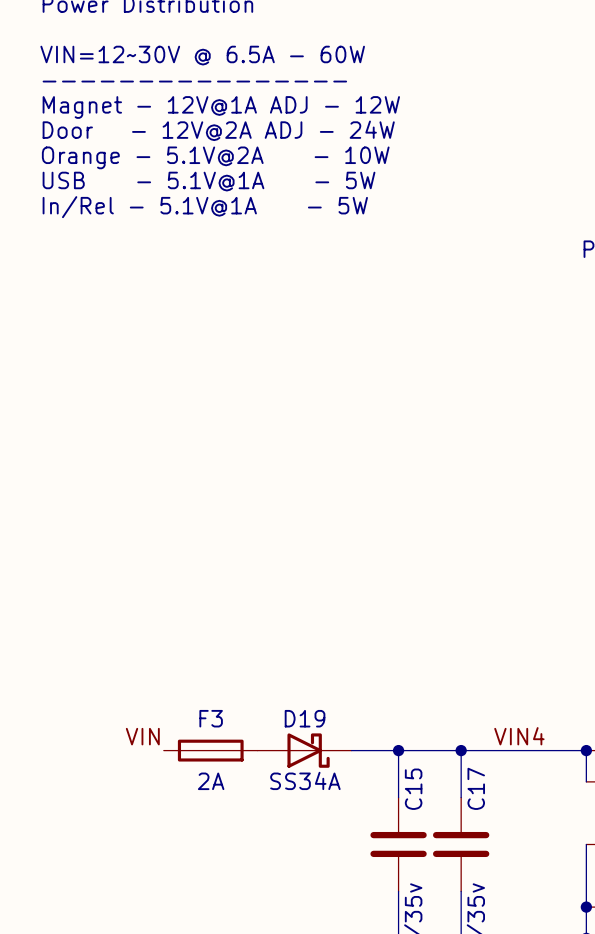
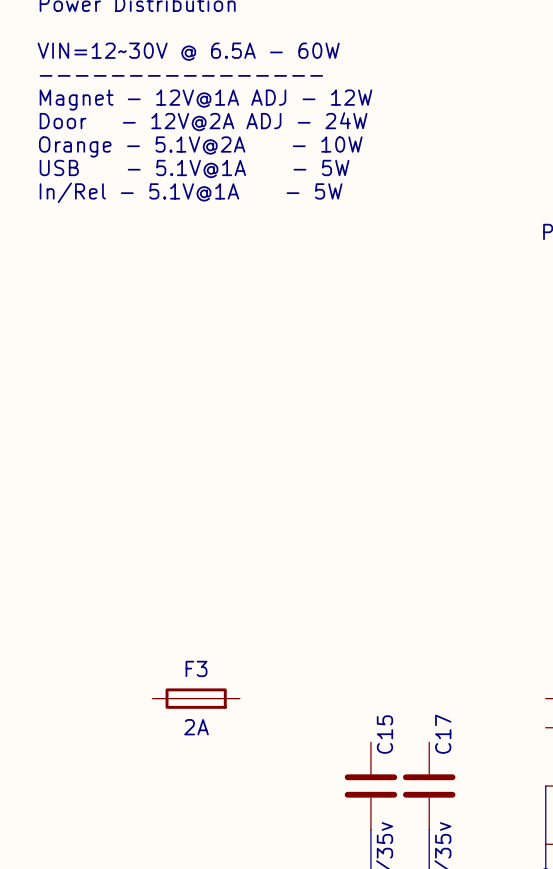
label: VIN (142, 736) -> none
label: VIN4 (519, 736) -> none
D19: SS34A (304, 750) -> none
wire: (351, 750) (586, 750) (586, 781) -> none
wire: (398, 750) (398, 797) -> none
junction: (398, 750) -> none
wire: (461, 750) (461, 797) -> none
junction: (461, 750) -> none
junction: (586, 750) -> none
junction: (586, 907) -> none

